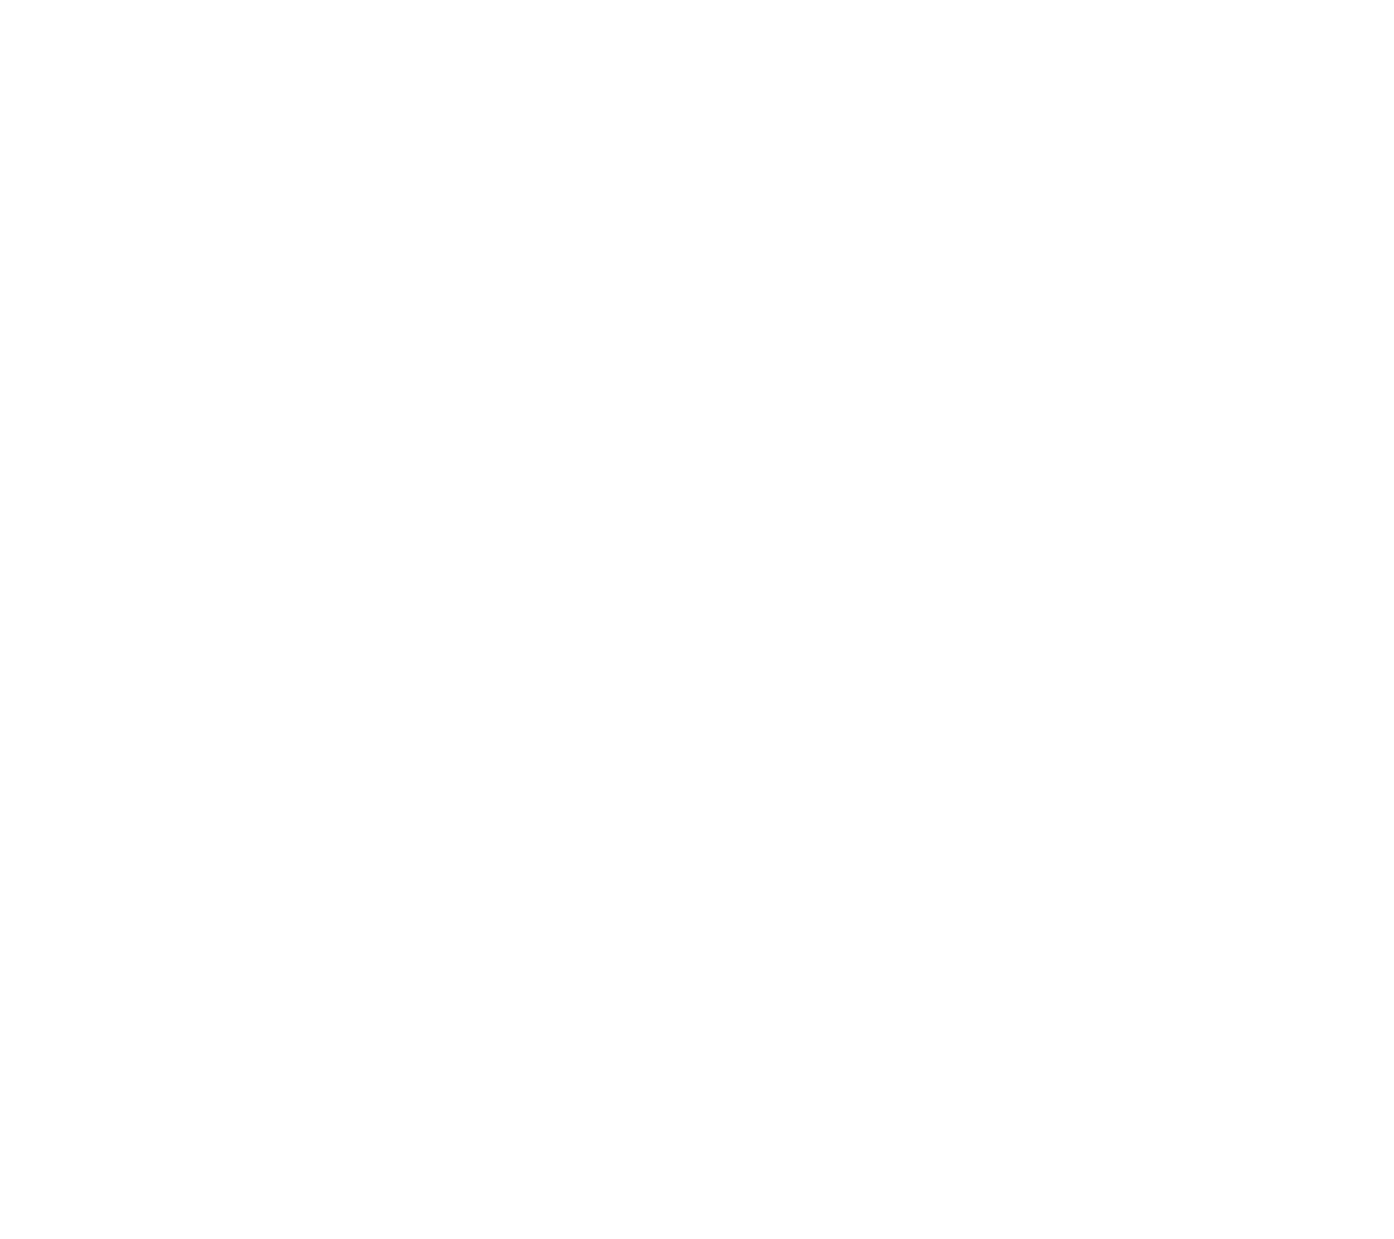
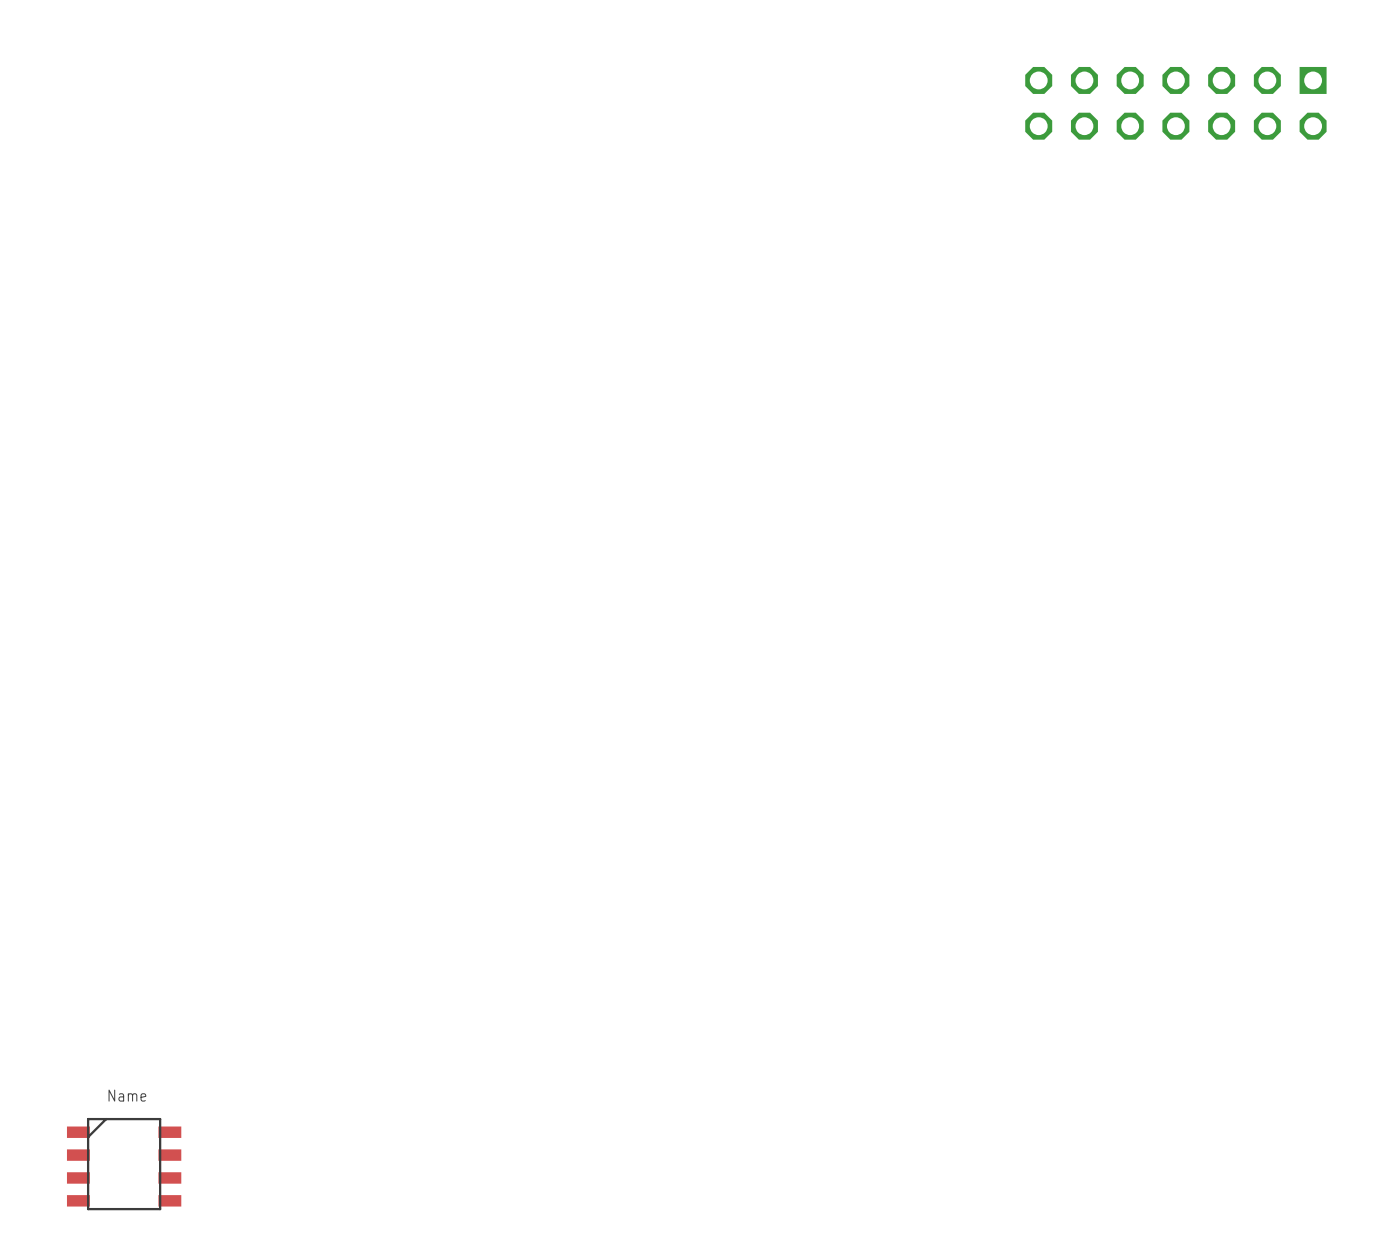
part: none -> (1175, 103)
part: none -> (124, 1164)

